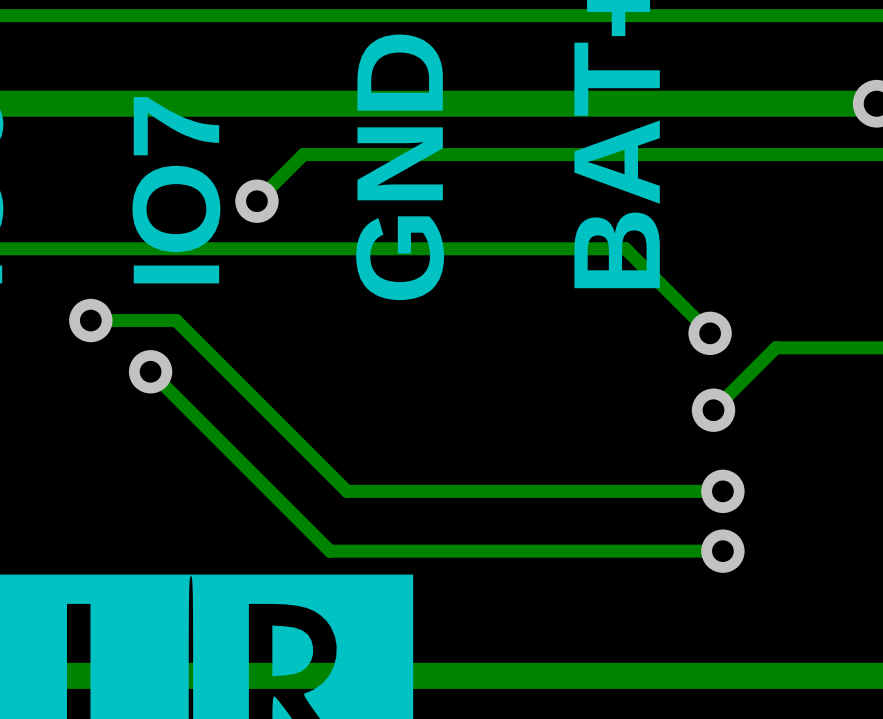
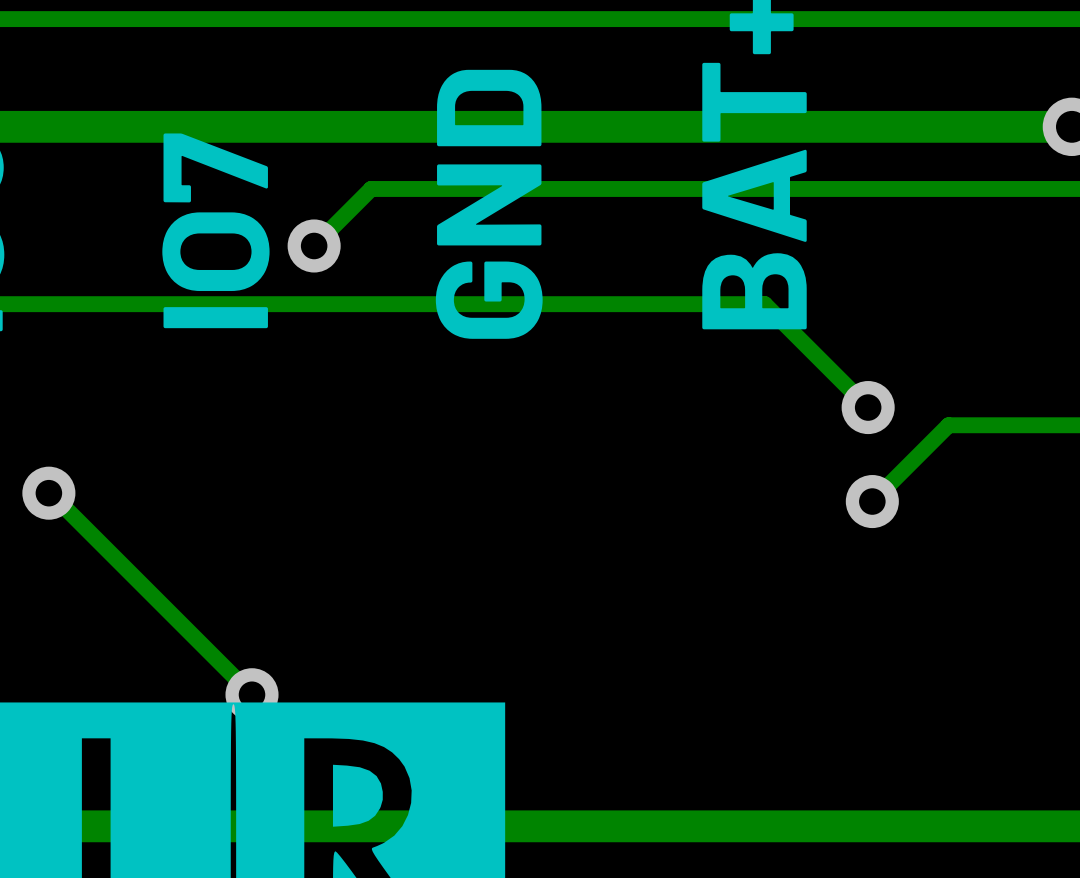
track: (90, 320) (176, 320) (347, 491) (722, 491) -> none
via: (90, 320) -> none
track: (150, 371) (329, 551) (722, 551) -> none
via: (150, 371) -> none
via: none -> (48, 493)
track: none -> (50, 493) (252, 694)
via: (722, 491) -> none
via: (722, 551) -> none
via: none -> (252, 694)

